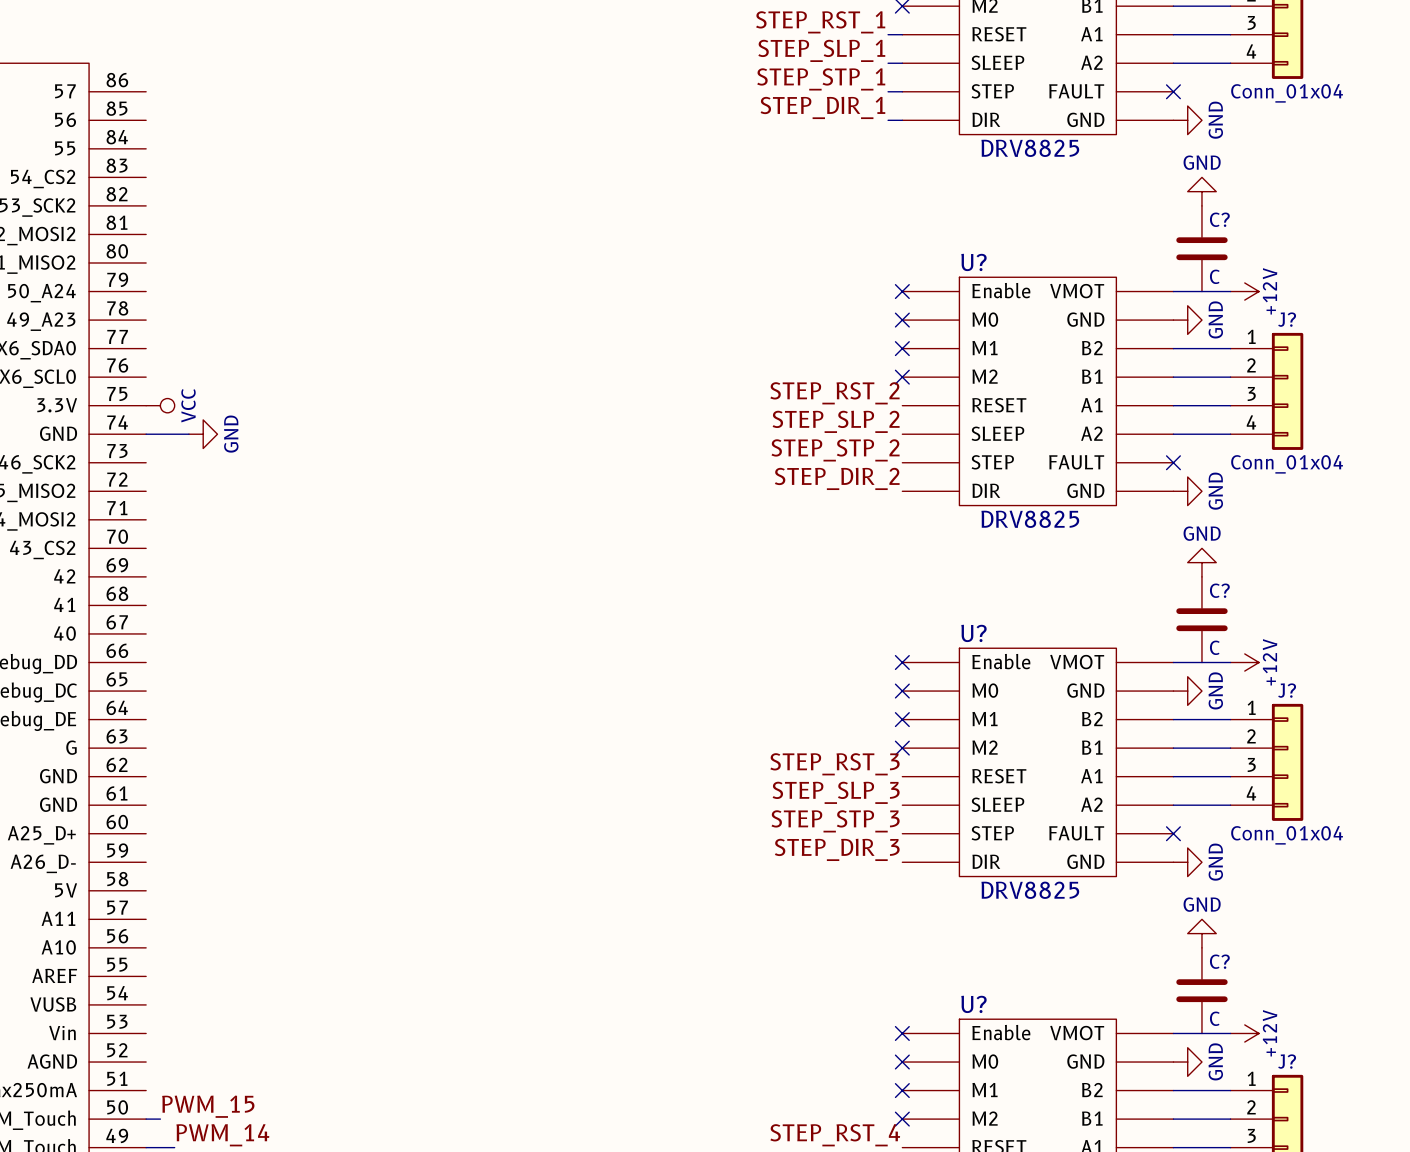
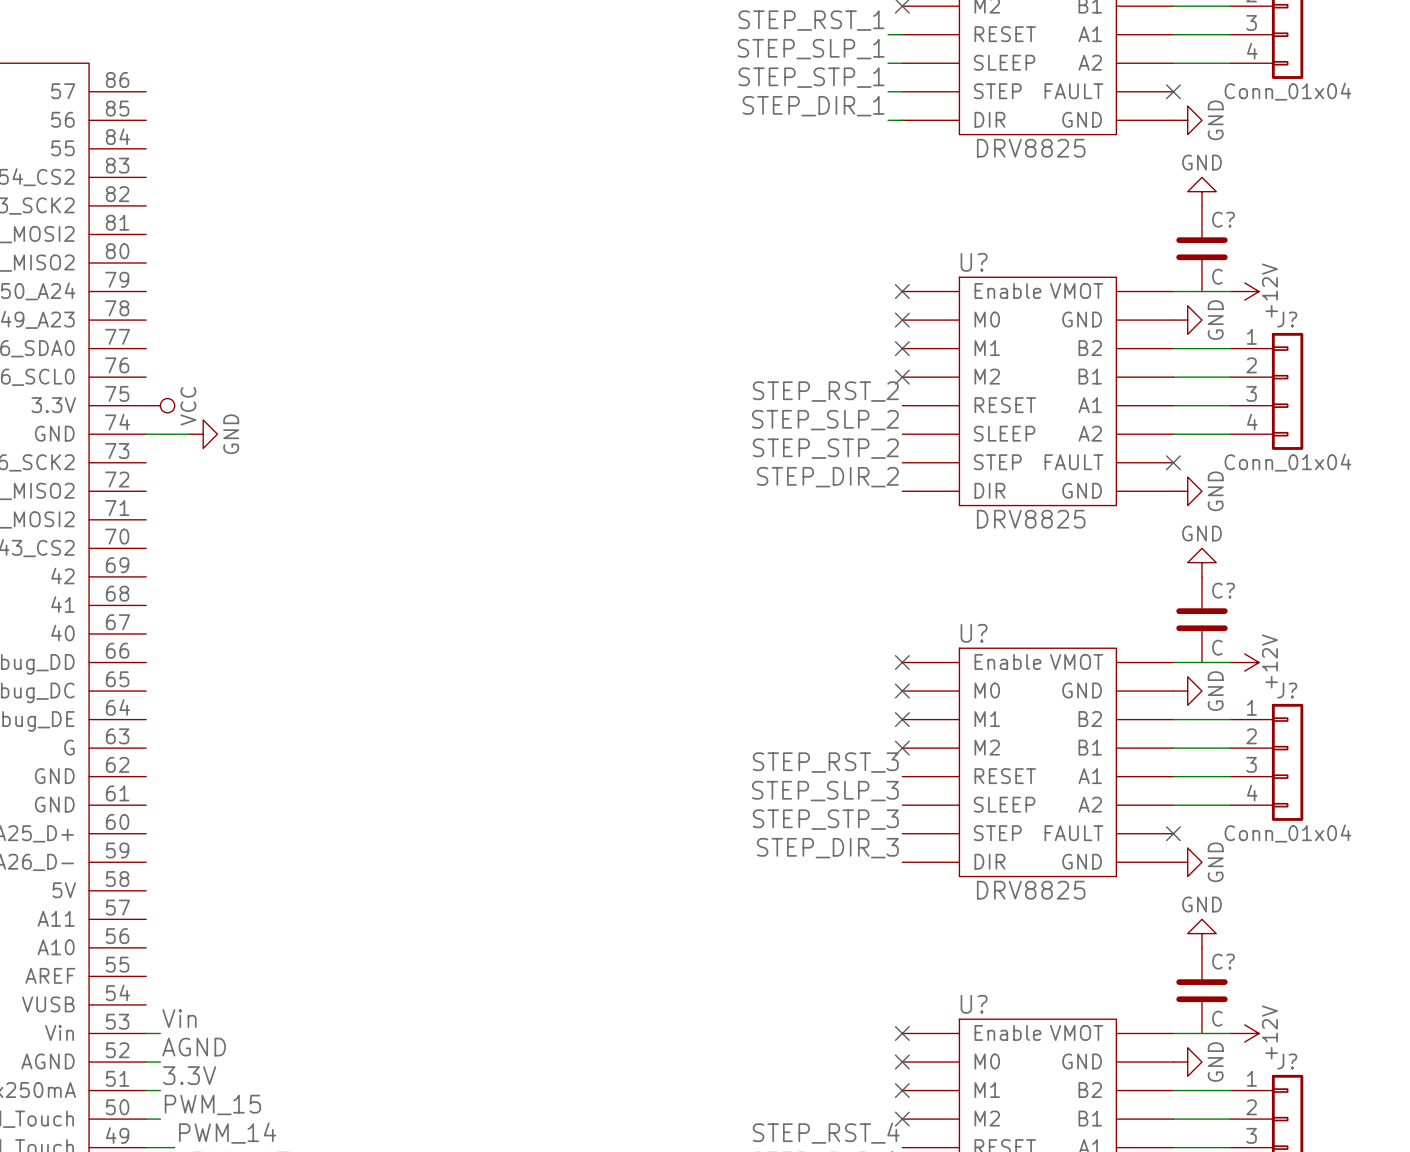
label: none -> Vin (179, 1018)
wire: none -> (146, 1033) (160, 1033)
label: none -> AGND (194, 1047)
wire: none -> (146, 1062) (160, 1062)
label: none -> 3.3V (189, 1075)
wire: none -> (146, 1090) (160, 1090)

